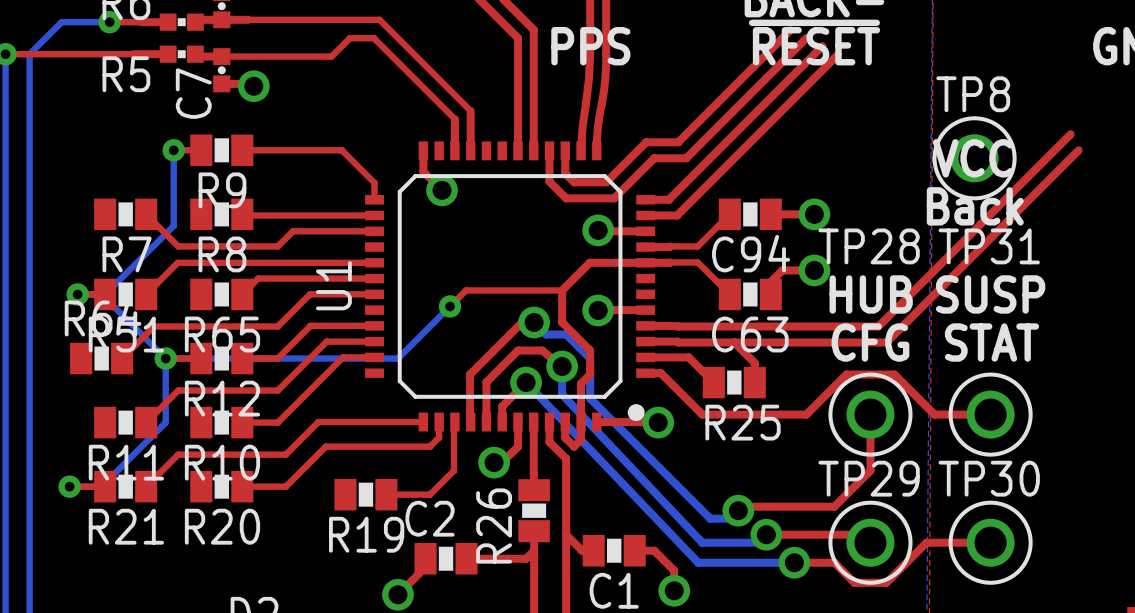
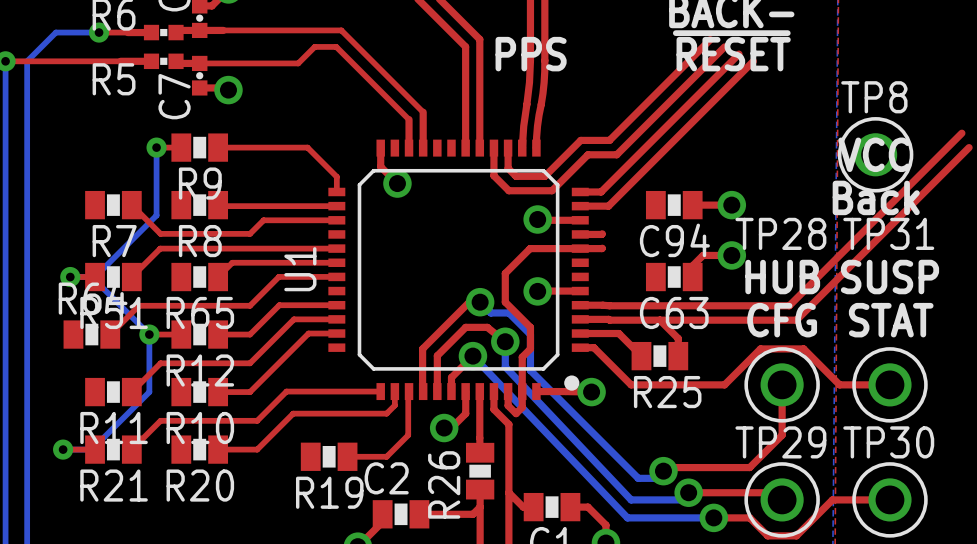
top track: (729, 214) (697, 246) (670, 246) -> none
top track: (670, 262) (697, 262) (729, 294) -> none
top track: (562, 290) (466, 290) (450, 306) -> none
bottom track: (450, 306) (397, 358) (165, 358) -> none
via: (450, 306) -> none

